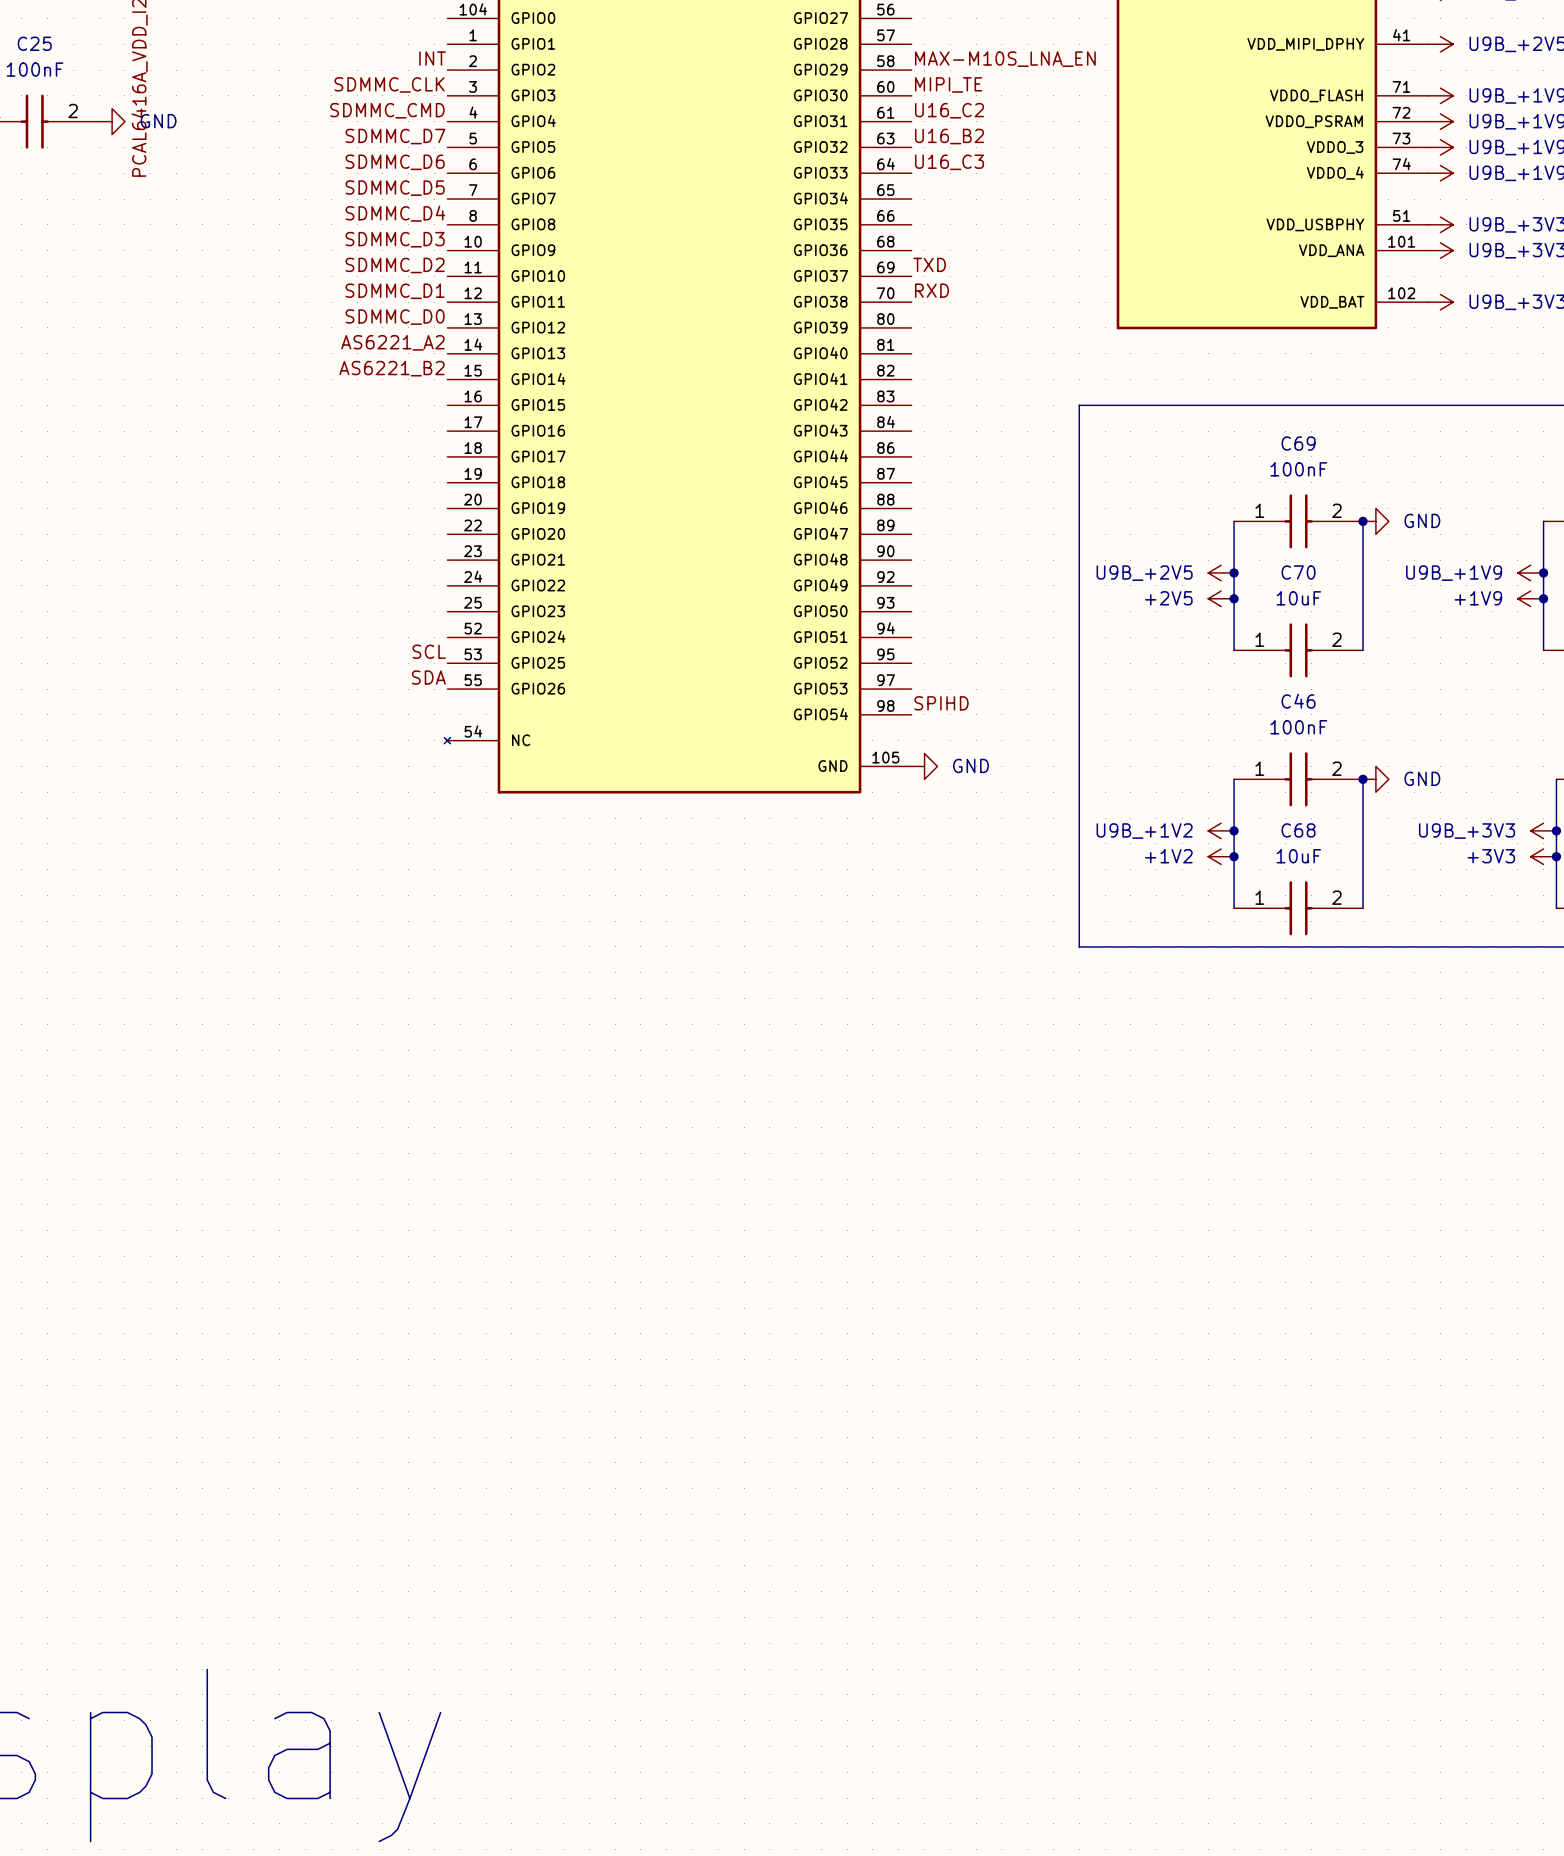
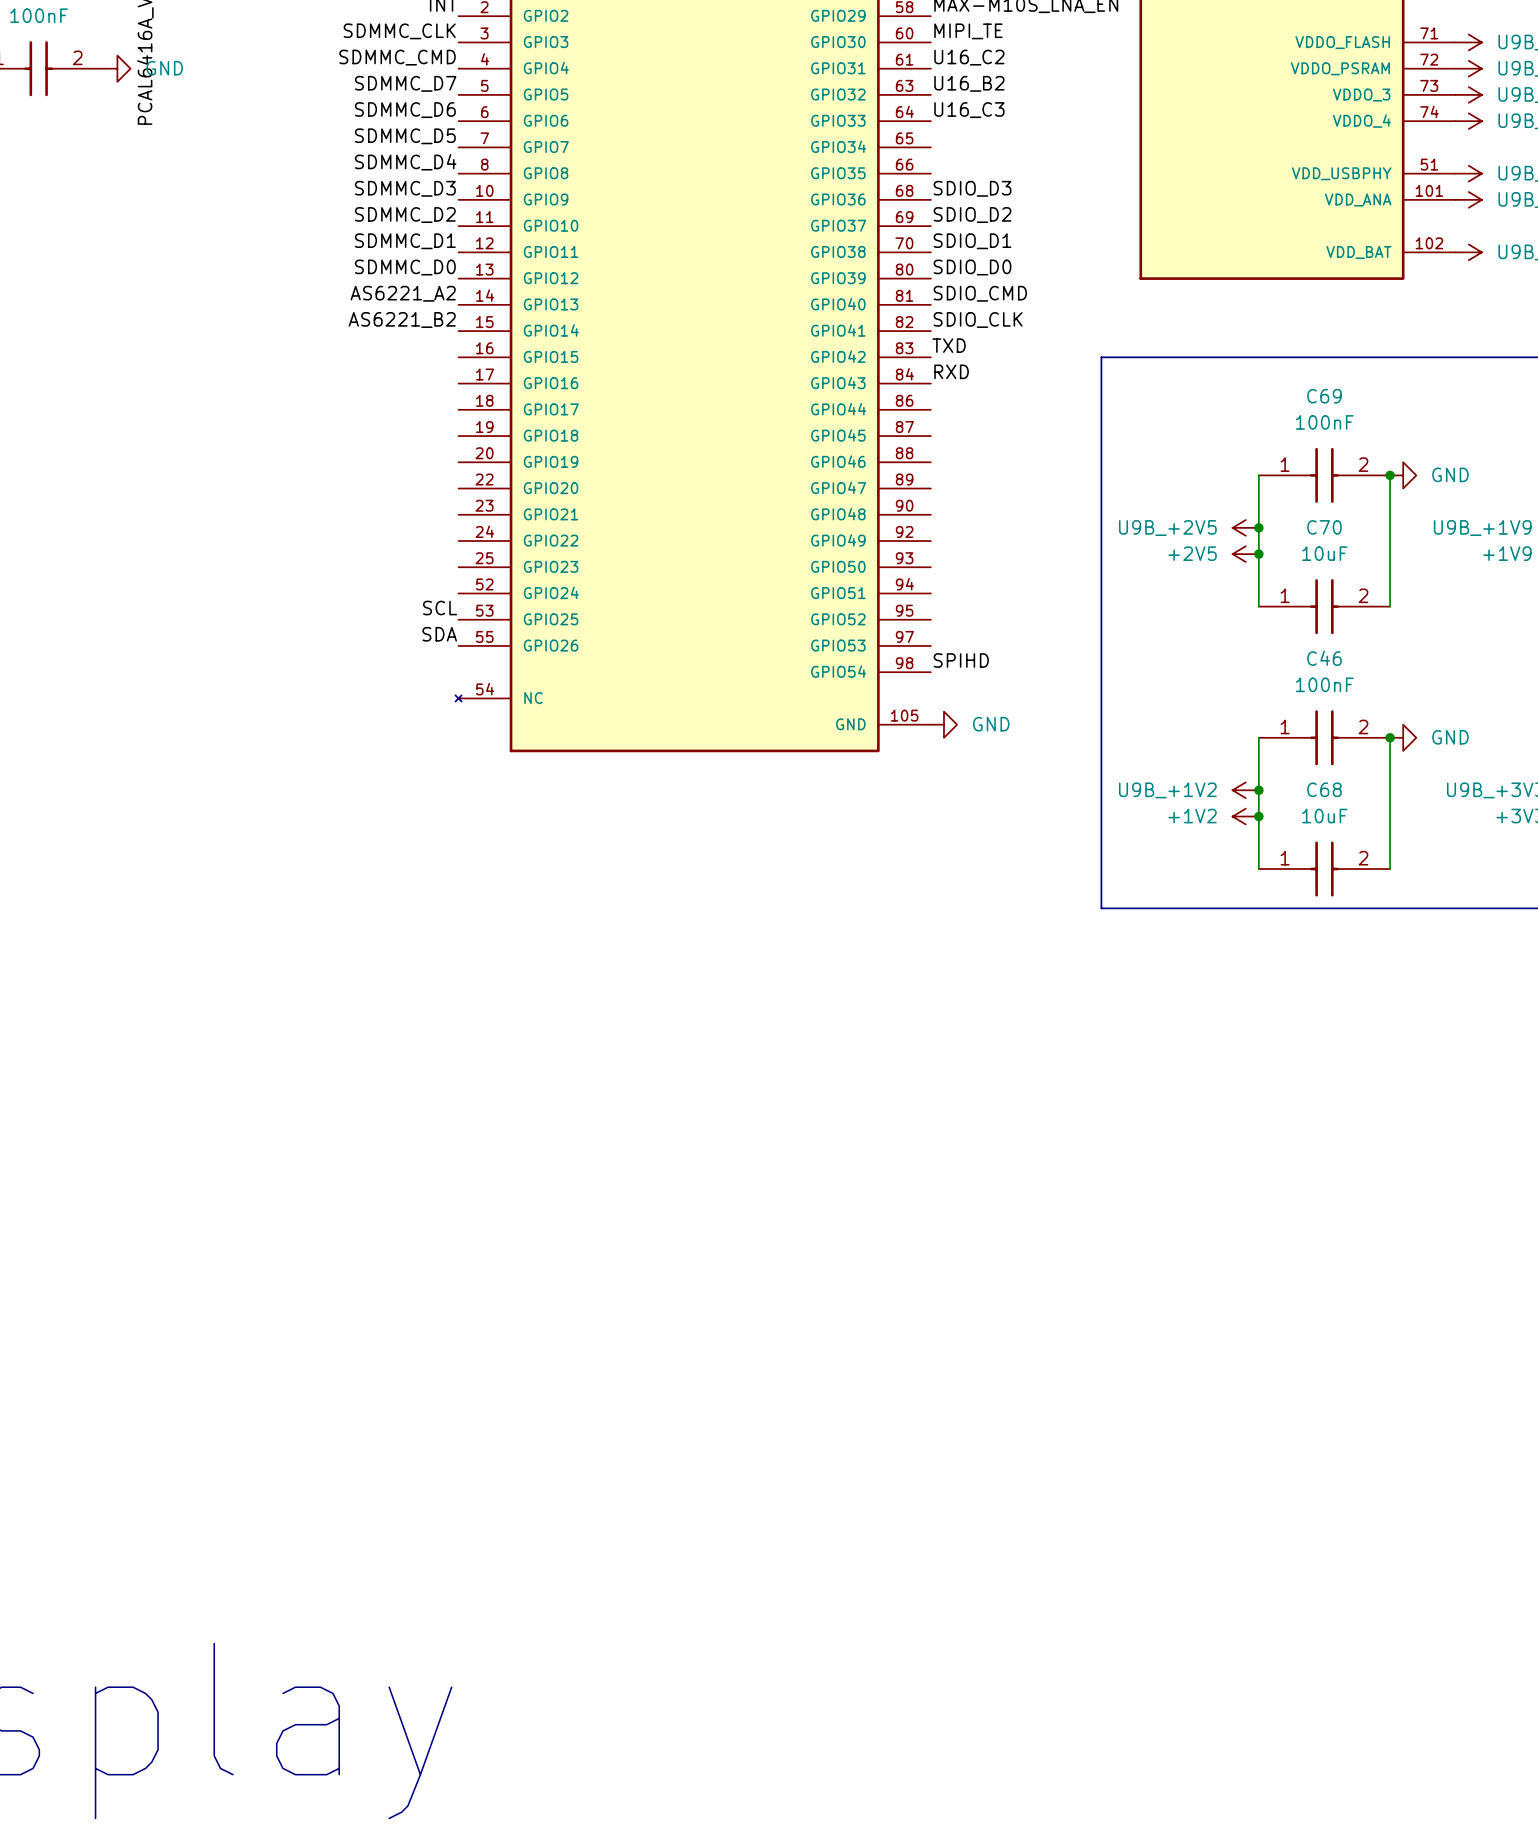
label: none -> SDIO_D3 (972, 188)
label: TXD (929, 264) -> SDIO_D2 (972, 215)
label: RXD (932, 290) -> SDIO_D1 (972, 241)
label: none -> SDIO_D0 (972, 267)
label: none -> SDIO_CMD (980, 293)
label: none -> SDIO_CLK (978, 320)
label: none -> TXD (949, 345)
label: none -> RXD (951, 371)

